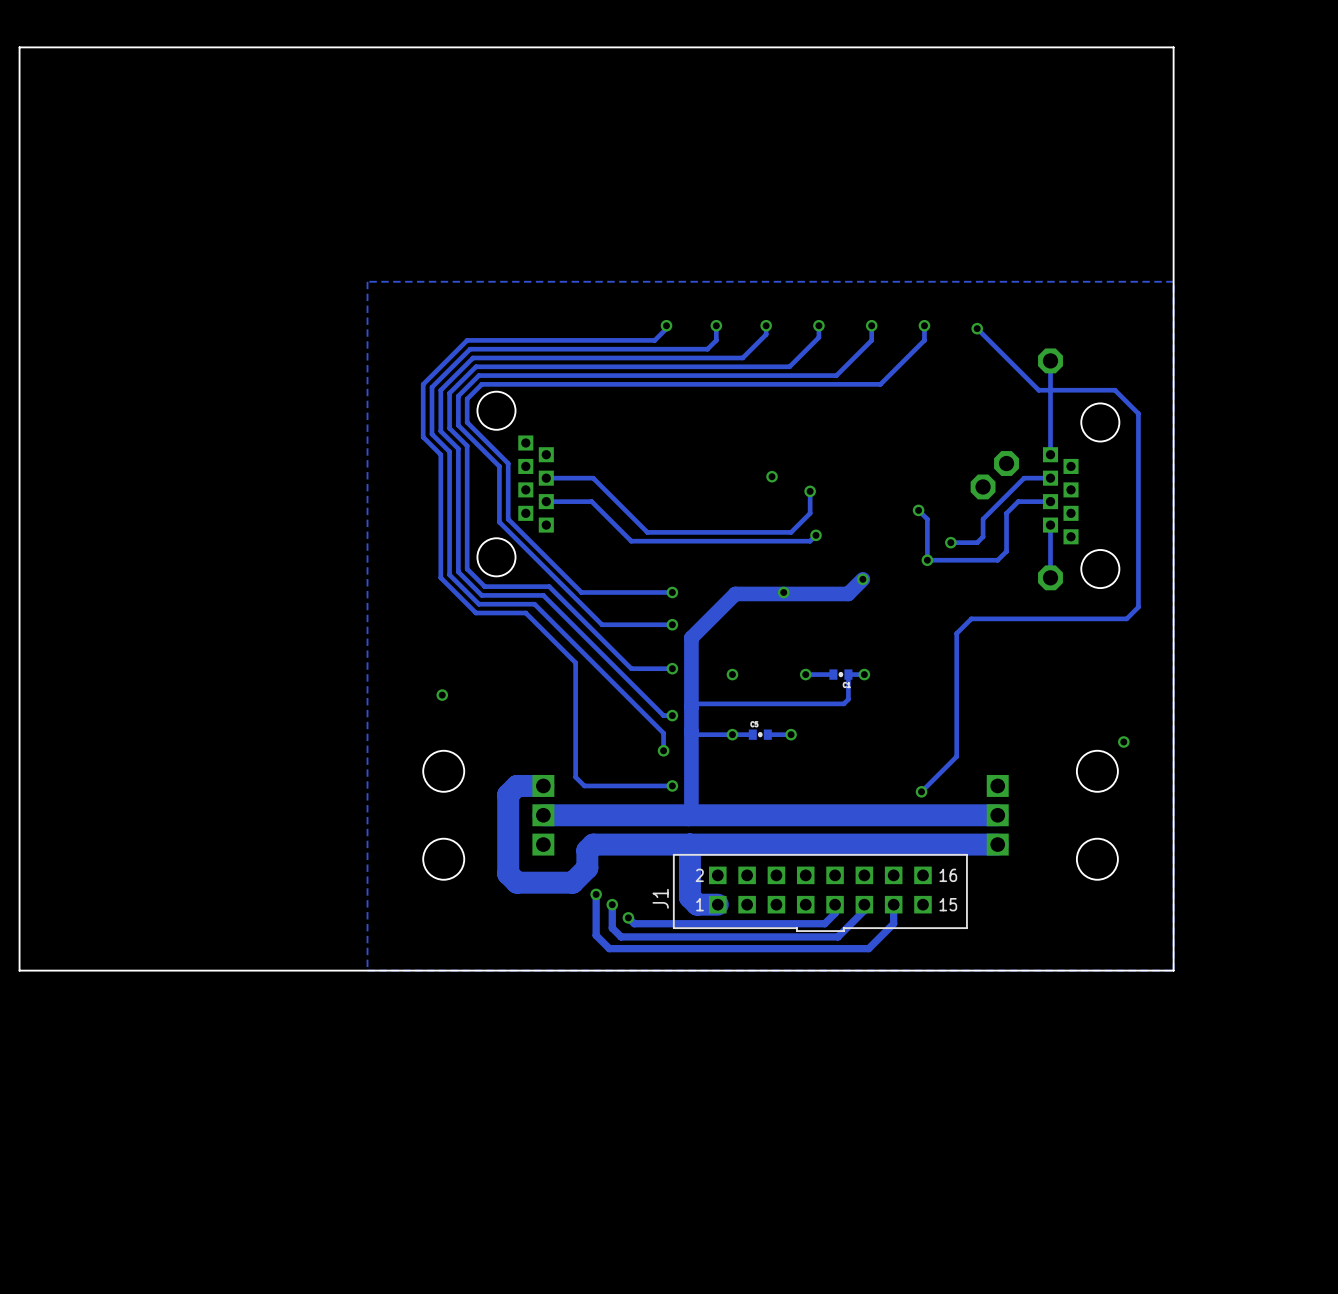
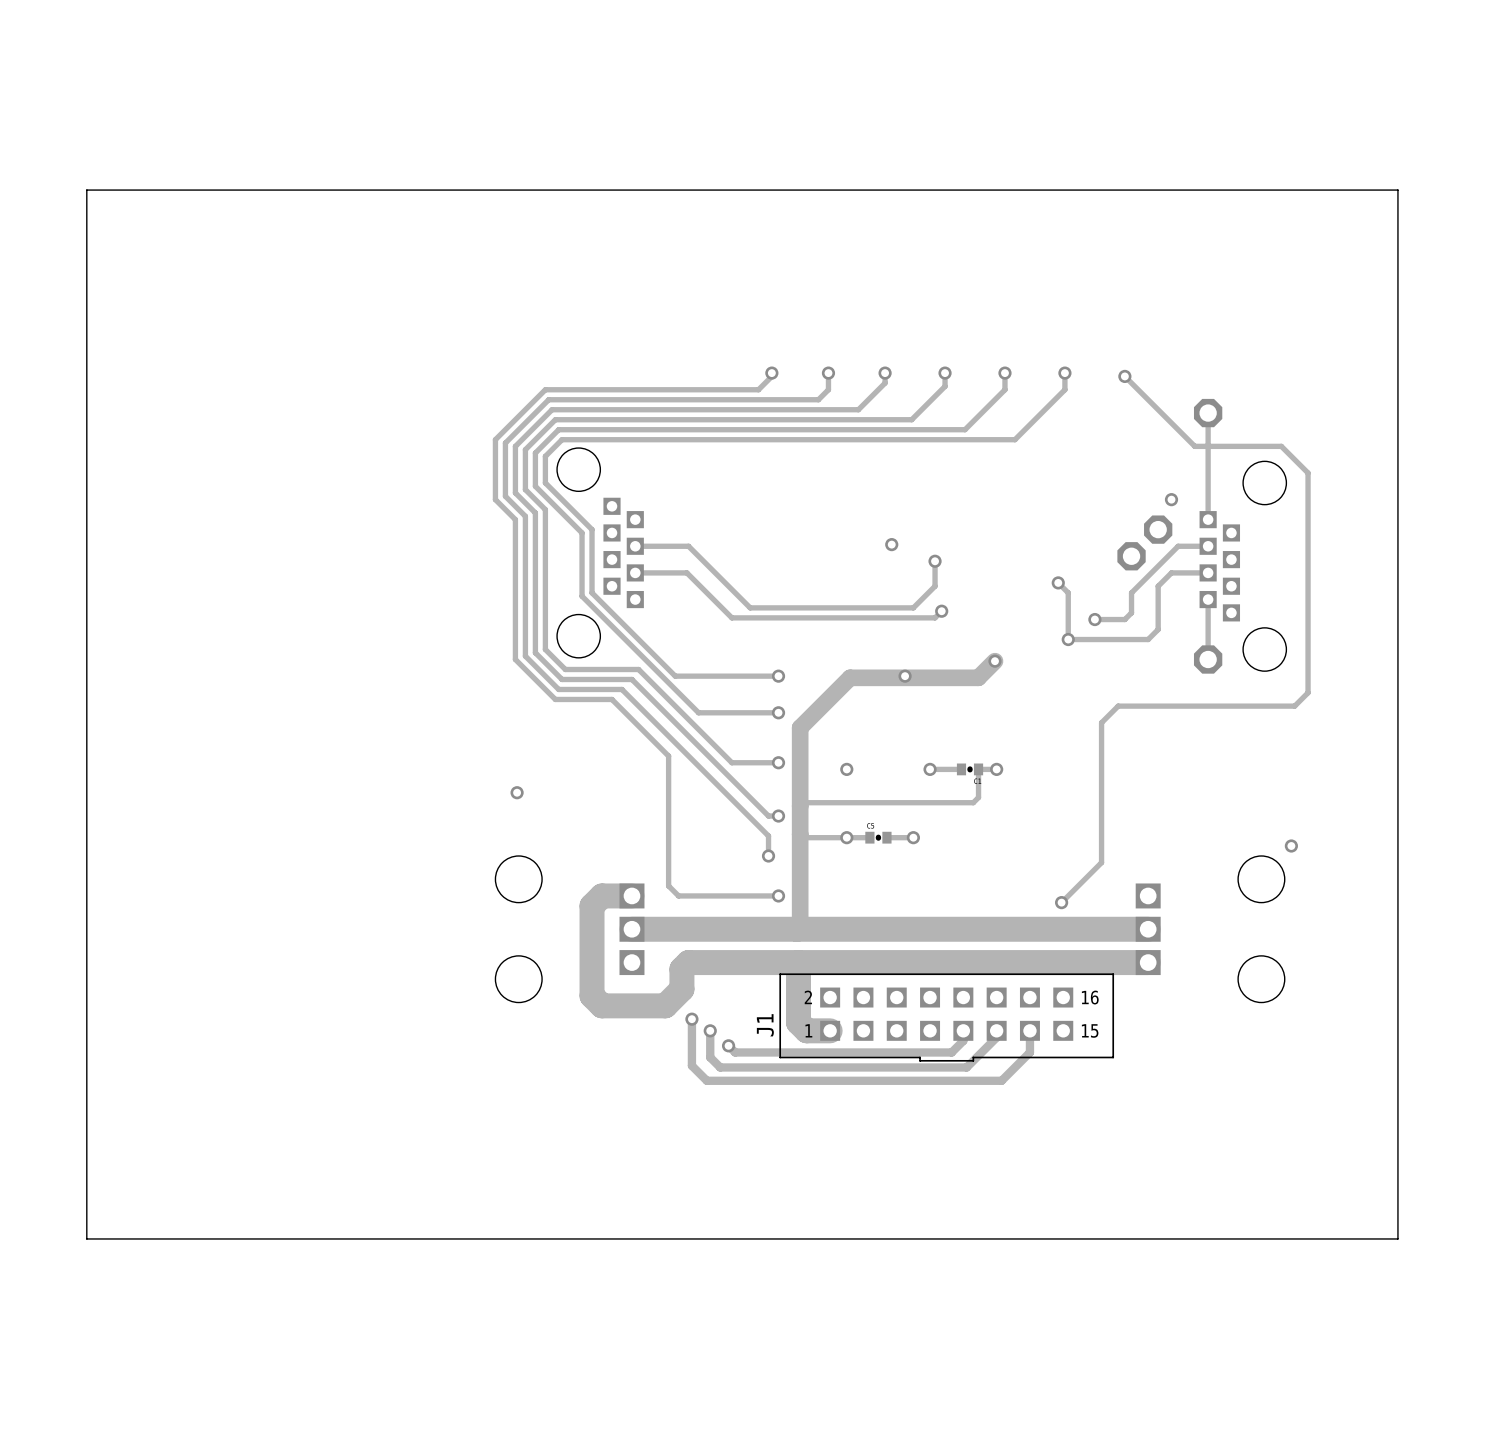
board edge: (1173, 47) (19, 47) (19, 970) (1173, 970) (1173, 47) -> (1397, 190) (1397, 1238) (86, 1238) (86, 190) (1397, 190)
zone outline: (1173, 281) (367, 281) (367, 970) (1173, 970) (1173, 281) -> none
via: none -> (1171, 499)

